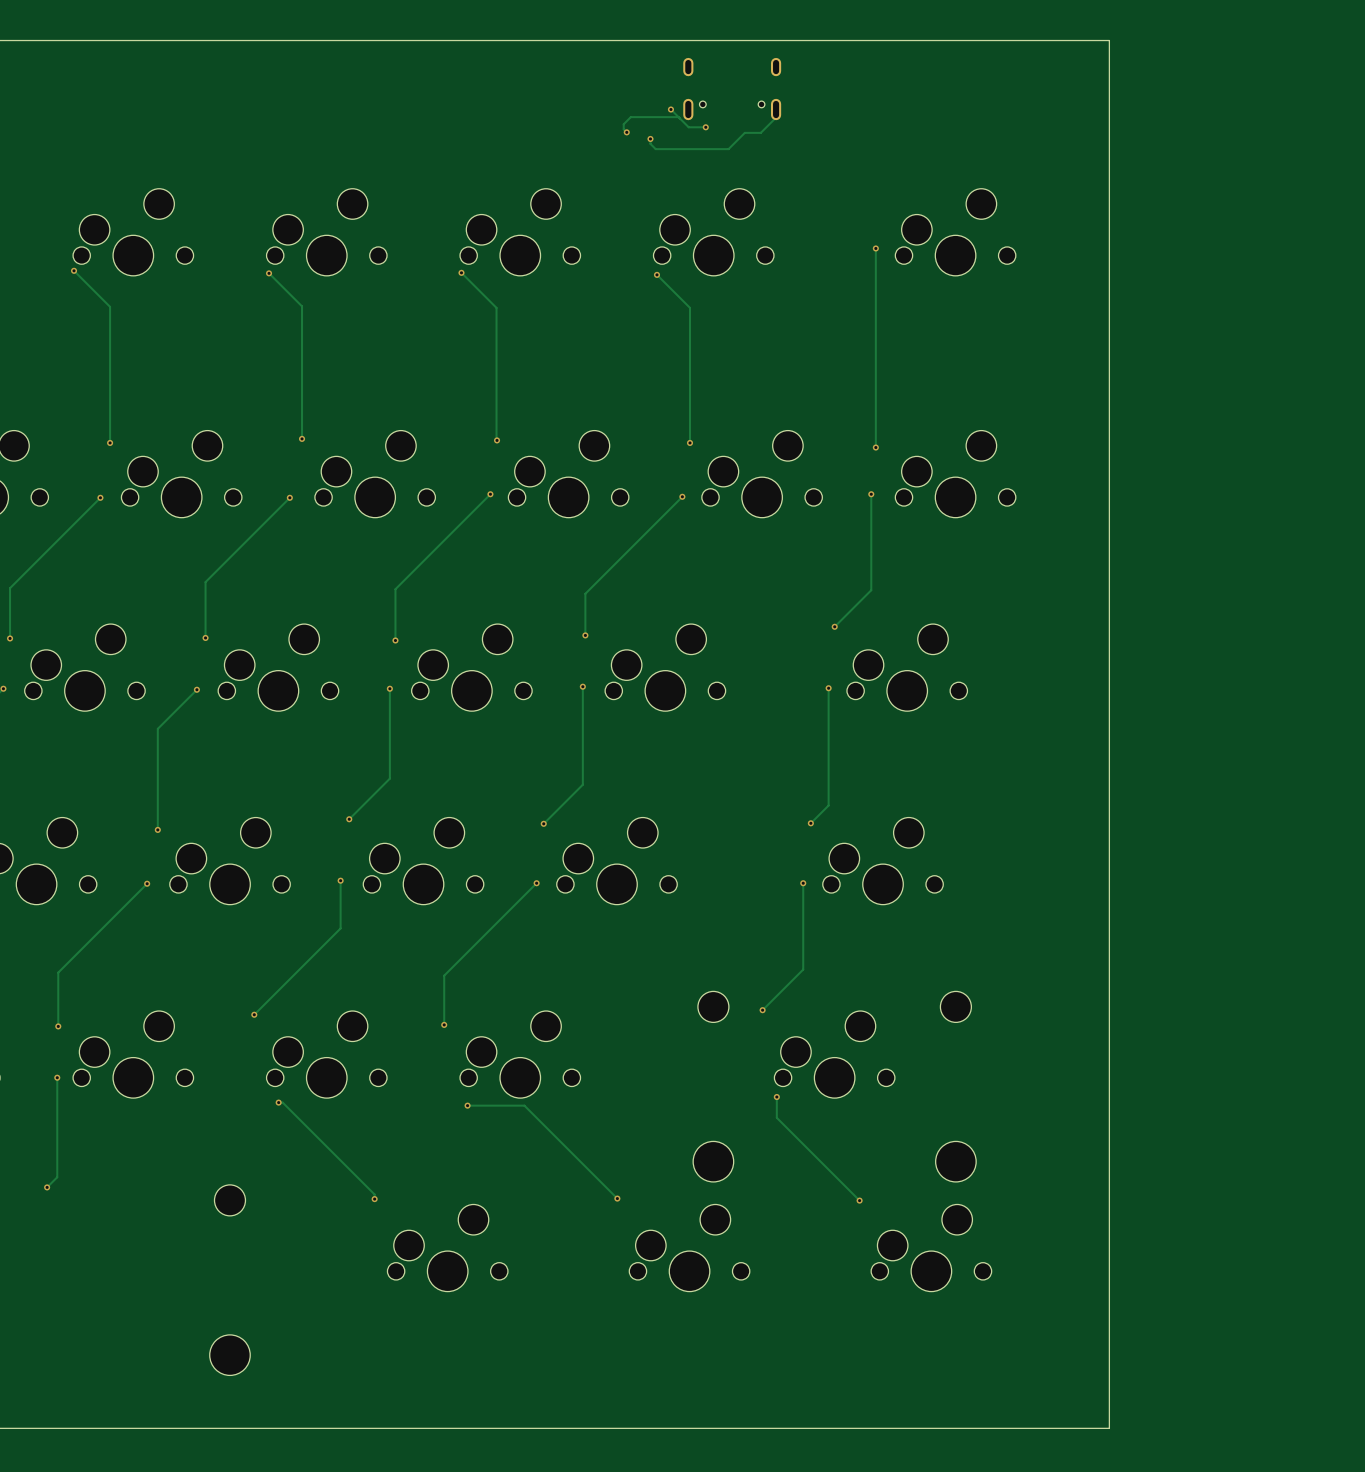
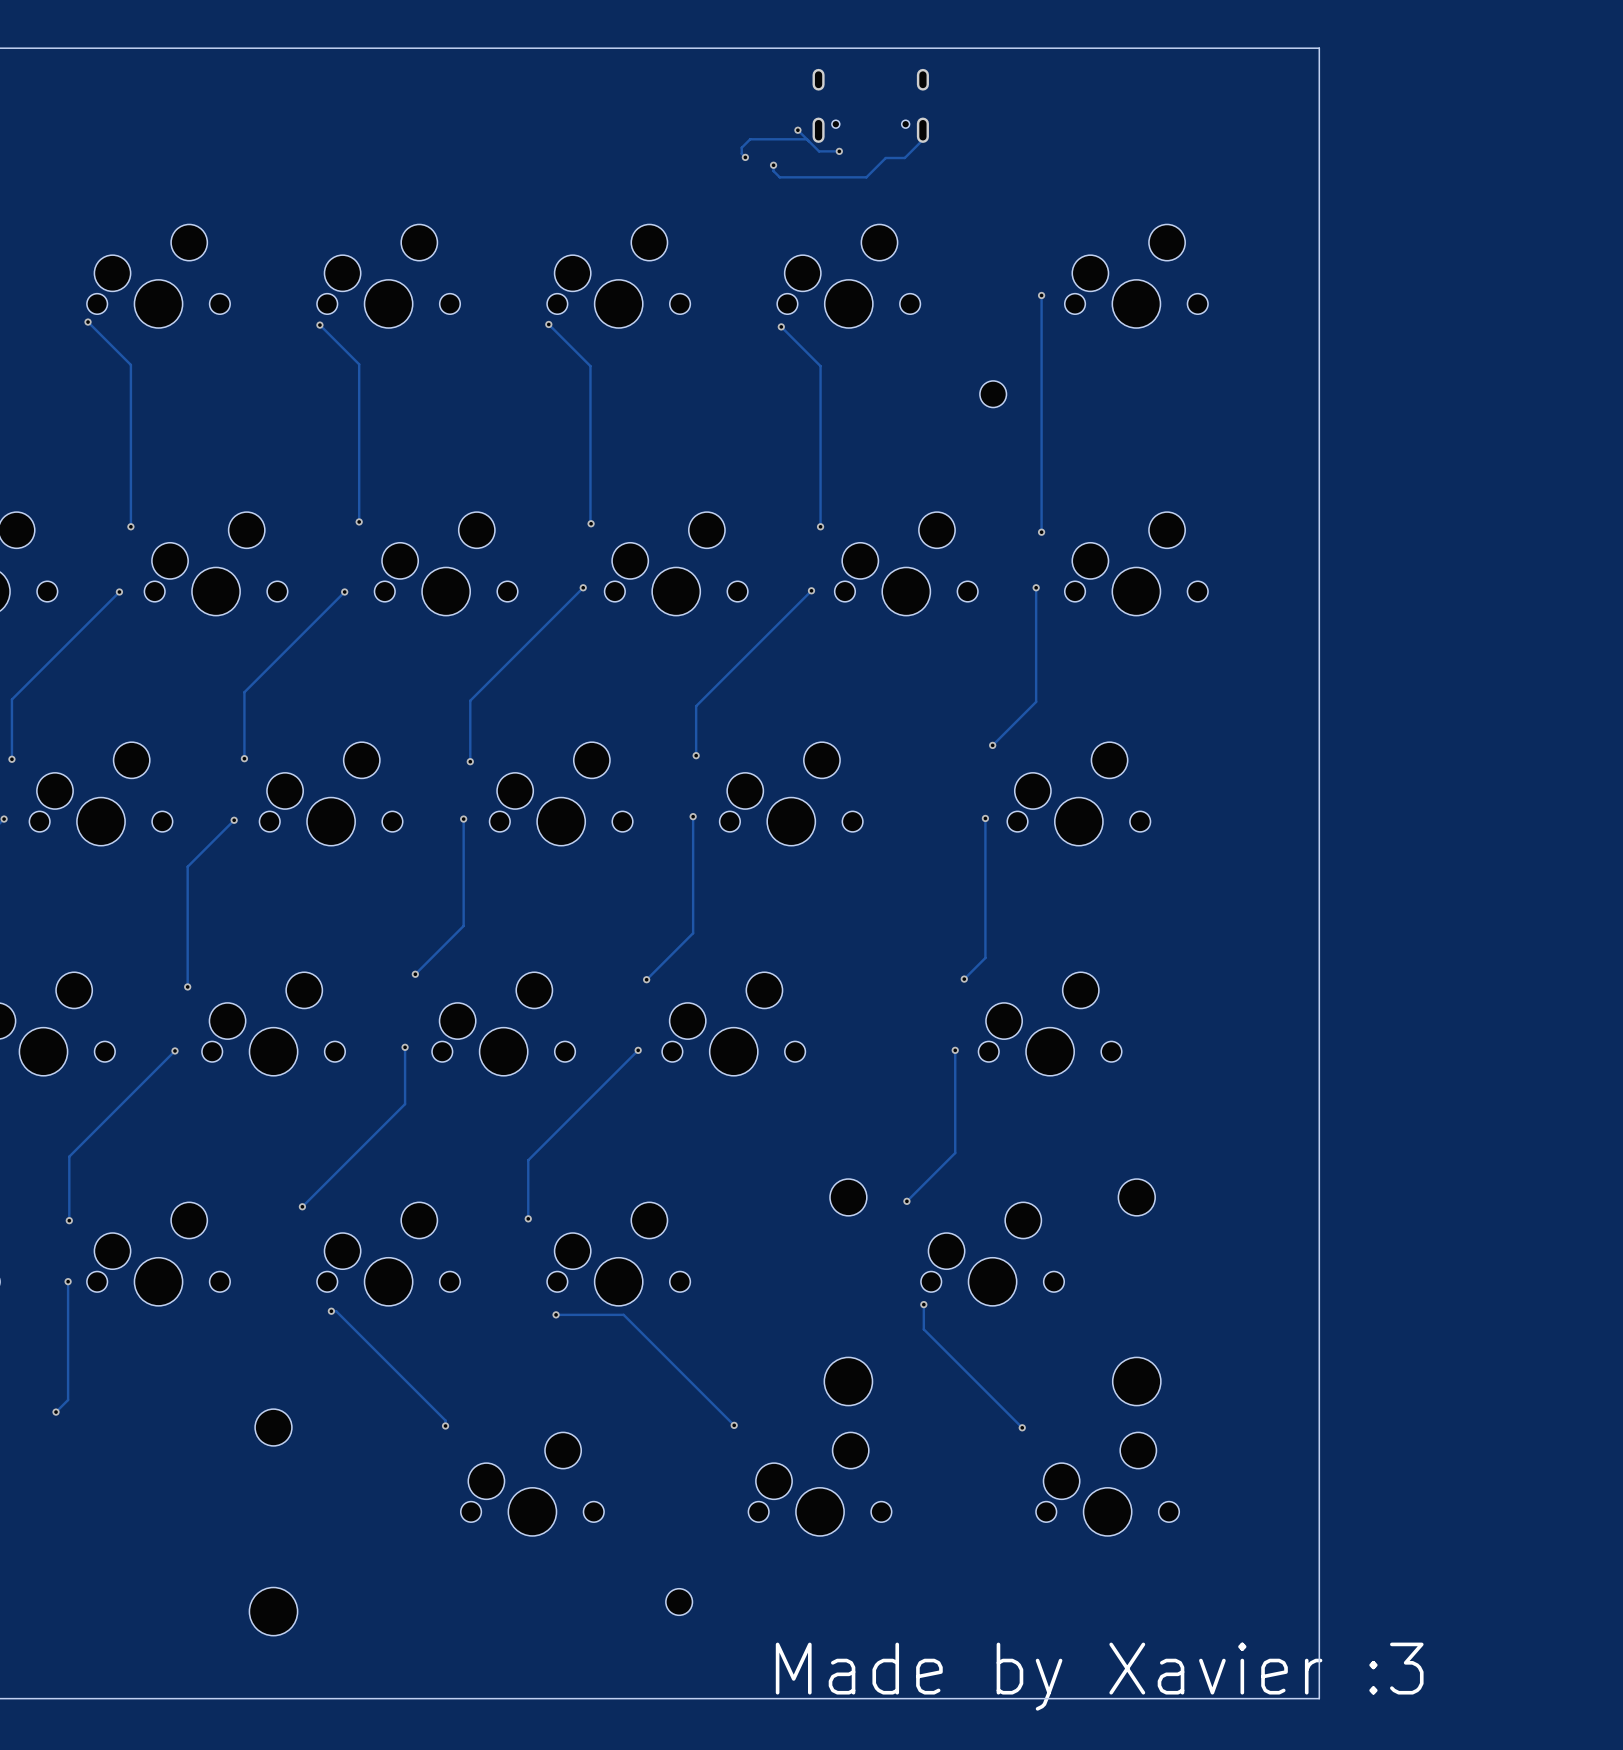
part: none -> (993, 394)
part: none -> (679, 1602)
text: none -> Made by Xavier :3 (1099, 1676)

